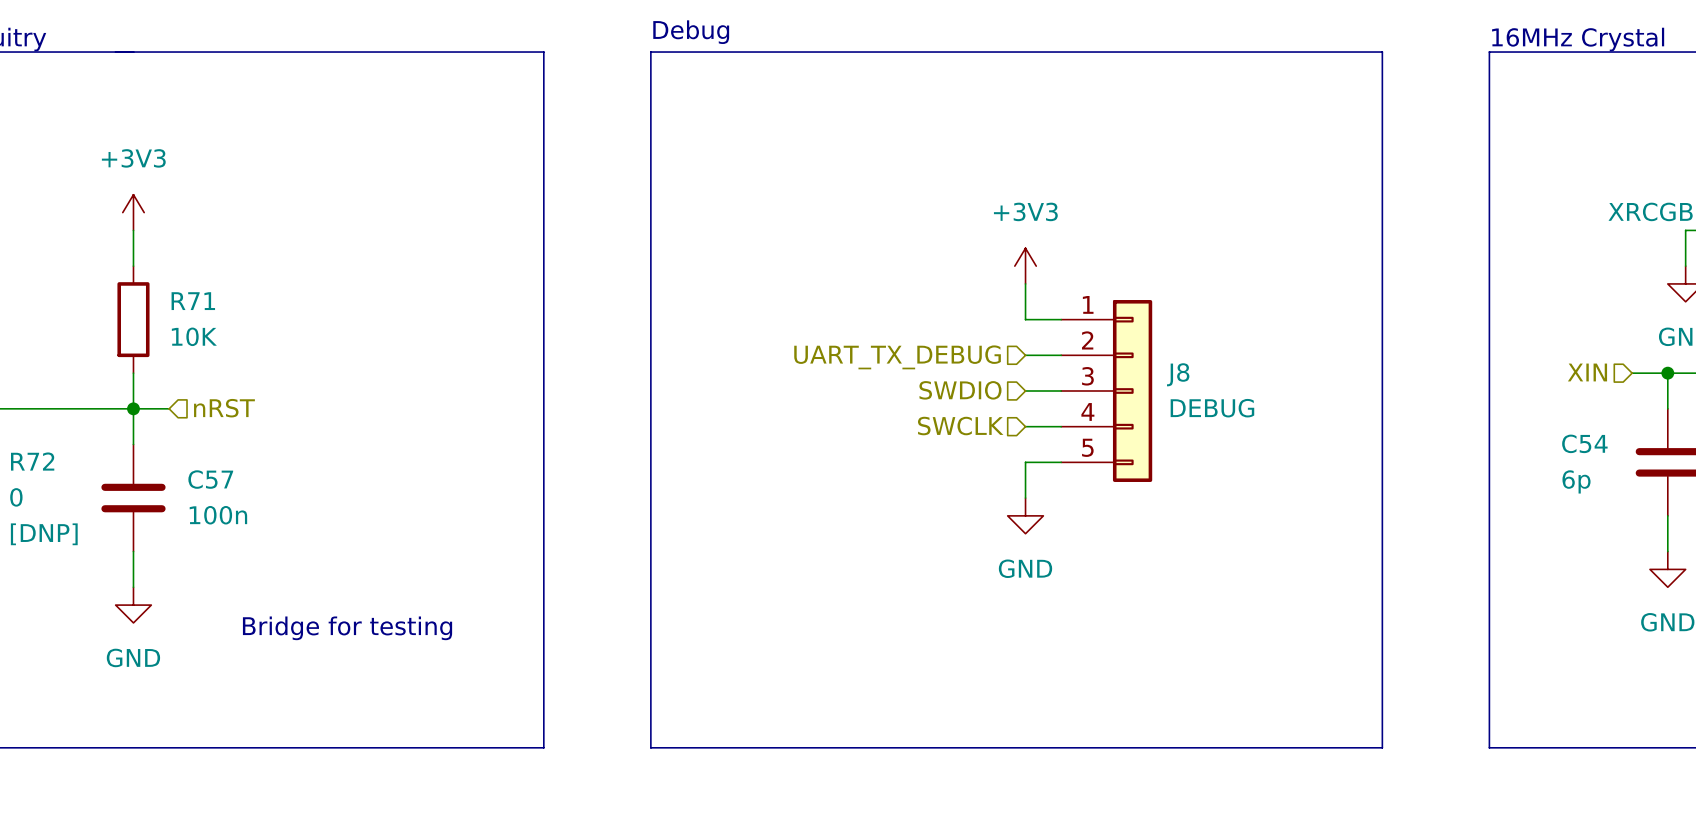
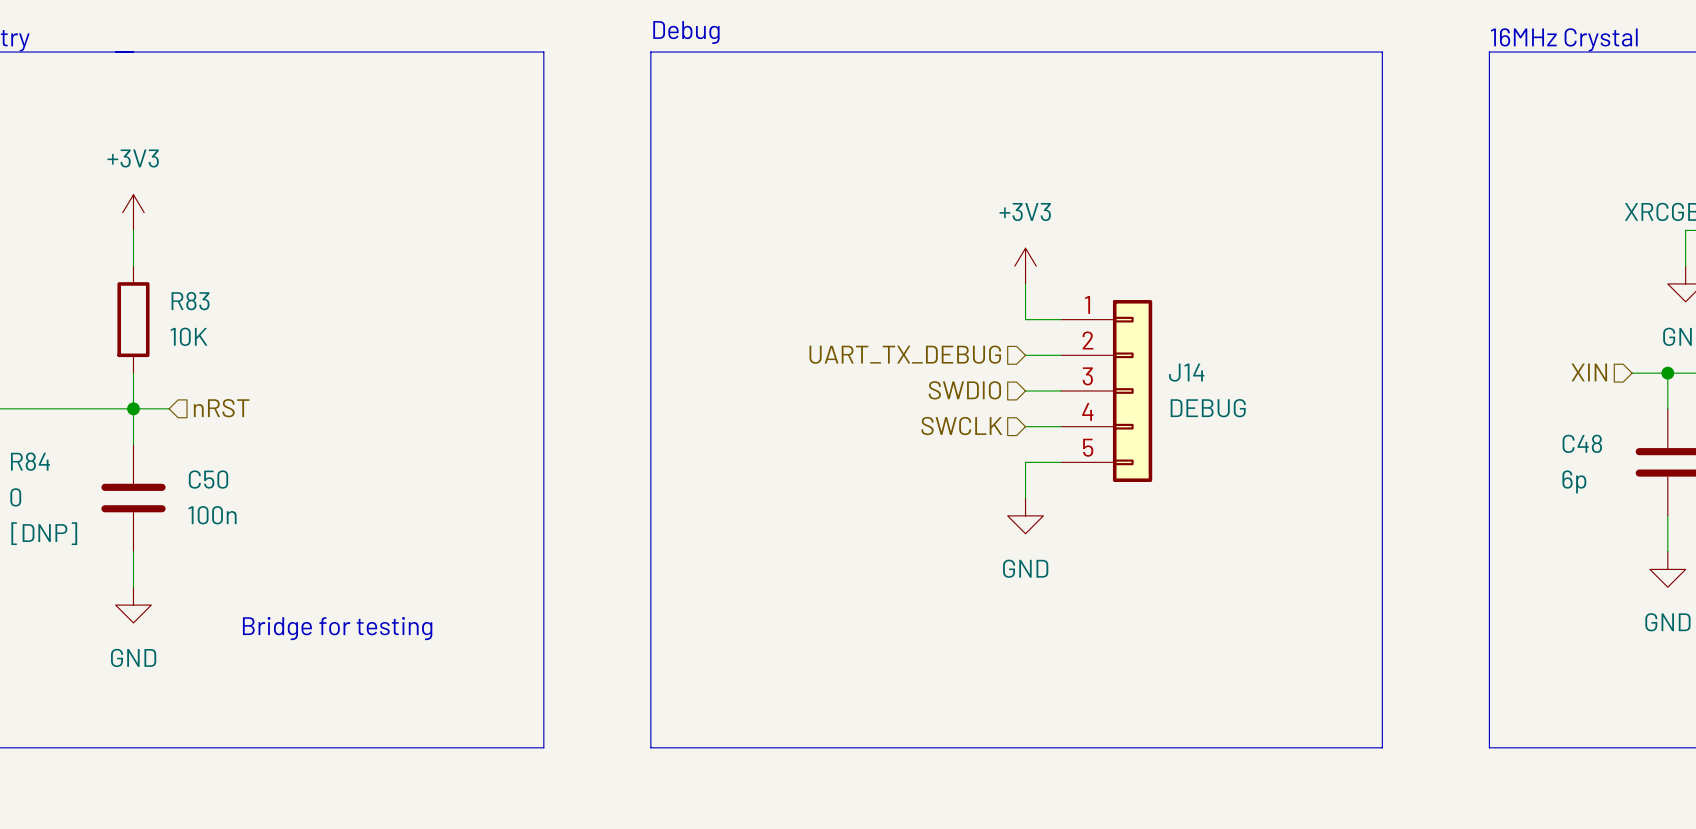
R71 name: R71 (193, 301) -> R83 (190, 301)
J8 name: J8 (1178, 374) -> J14 (1186, 372)
C54 name: C54 (1584, 443) -> C48 (1582, 443)
R72 name: R72 (32, 461) -> R84 (30, 461)
C57 name: C57 (210, 479) -> C50 (208, 479)

